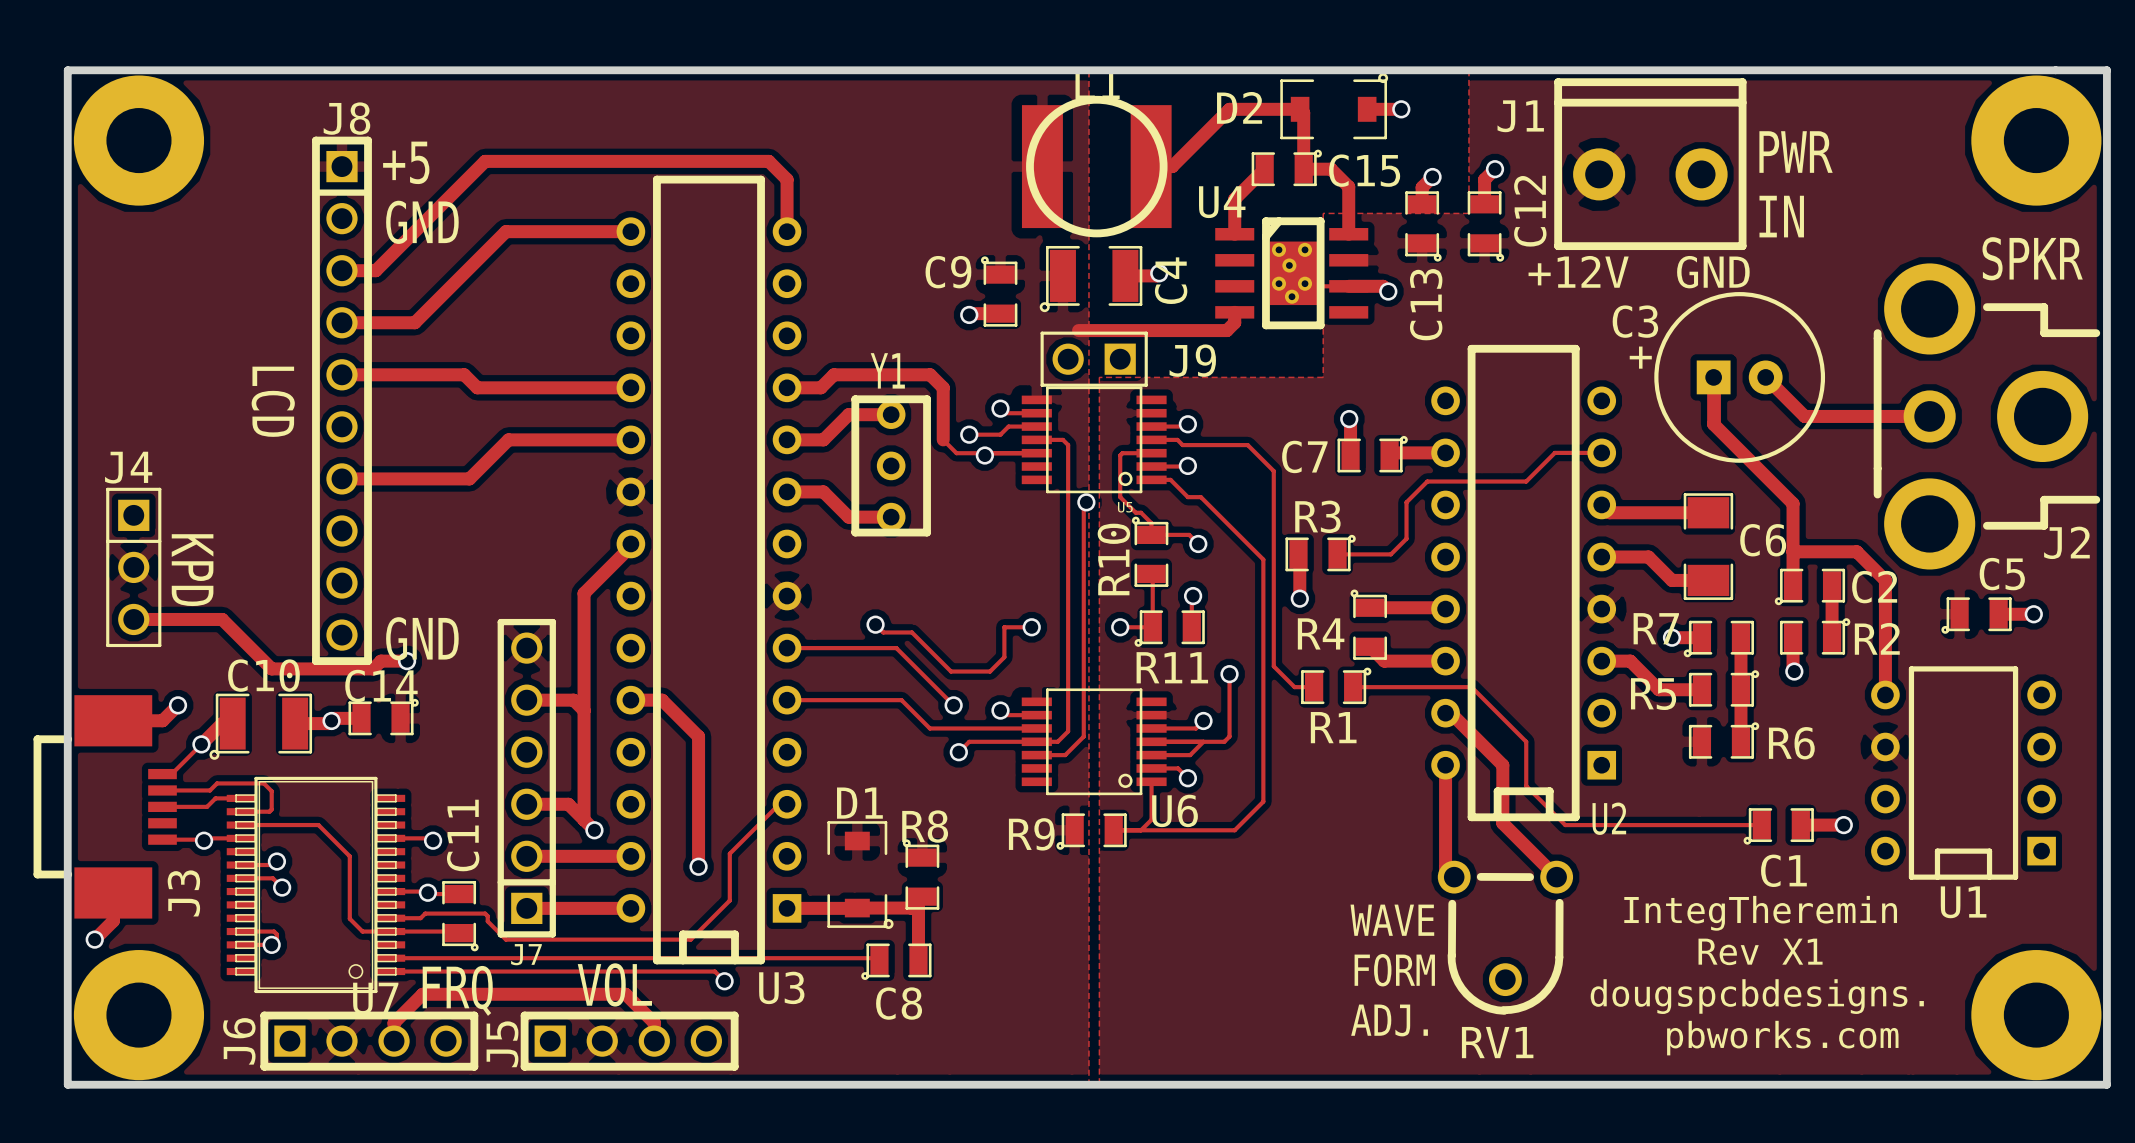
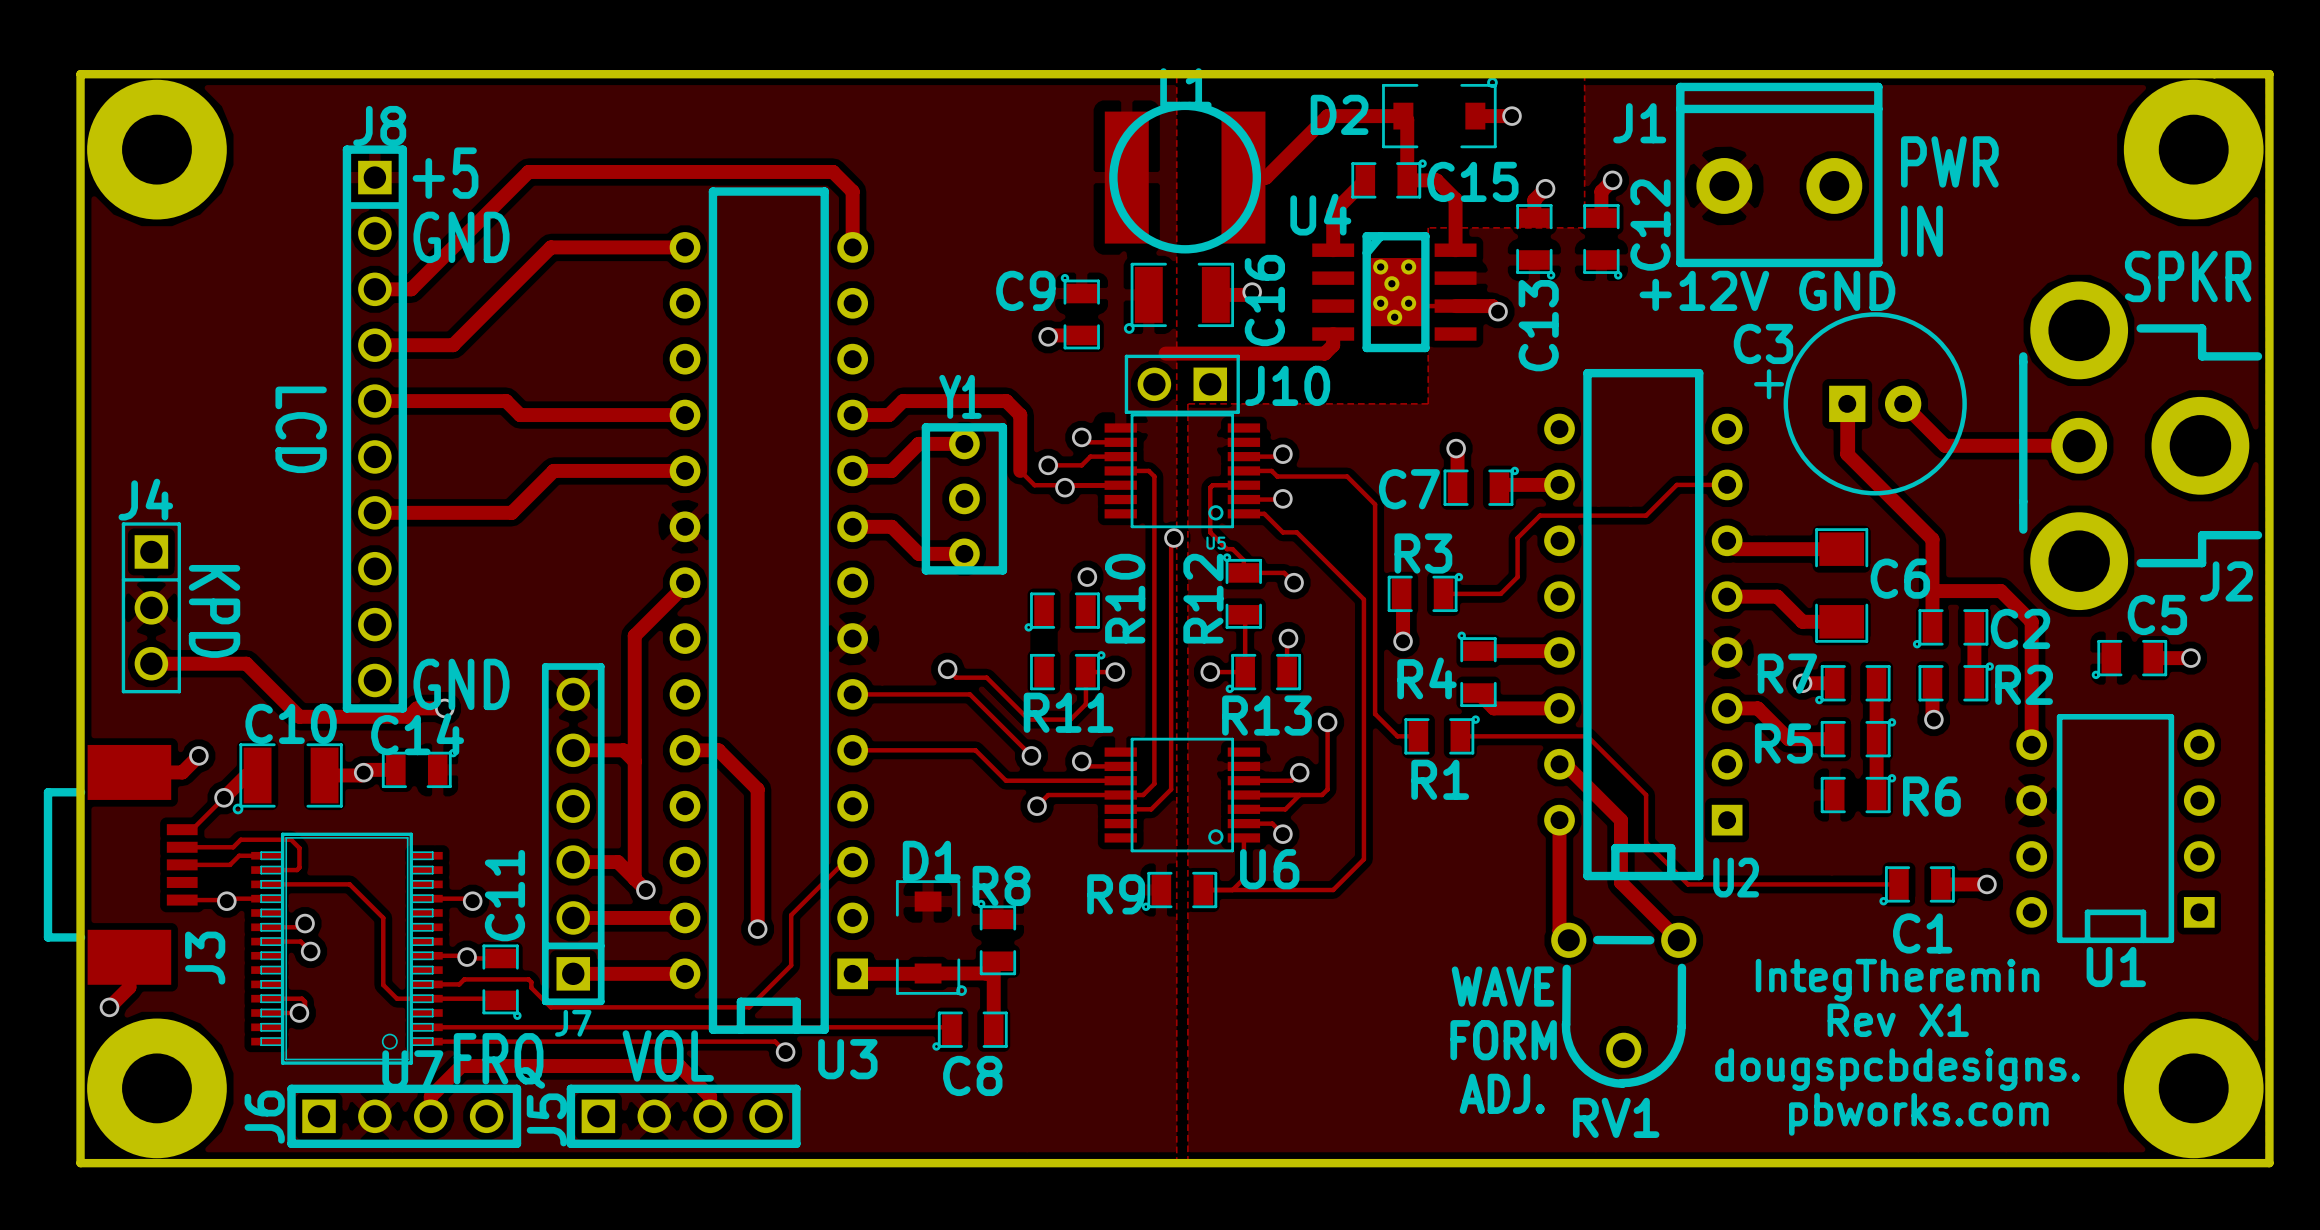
C4 name: C4 (1171, 280) -> C16 (1264, 300)
J9 name: J9 (1192, 360) -> J10 (1287, 385)
via: none -> (1087, 577)
R10 name: R10 (1113, 559) -> R12 (1203, 598)
R10: none -> (1062, 612)
R11: none -> (1067, 670)
R11 name: R11 (1172, 667) -> R13 (1266, 715)

